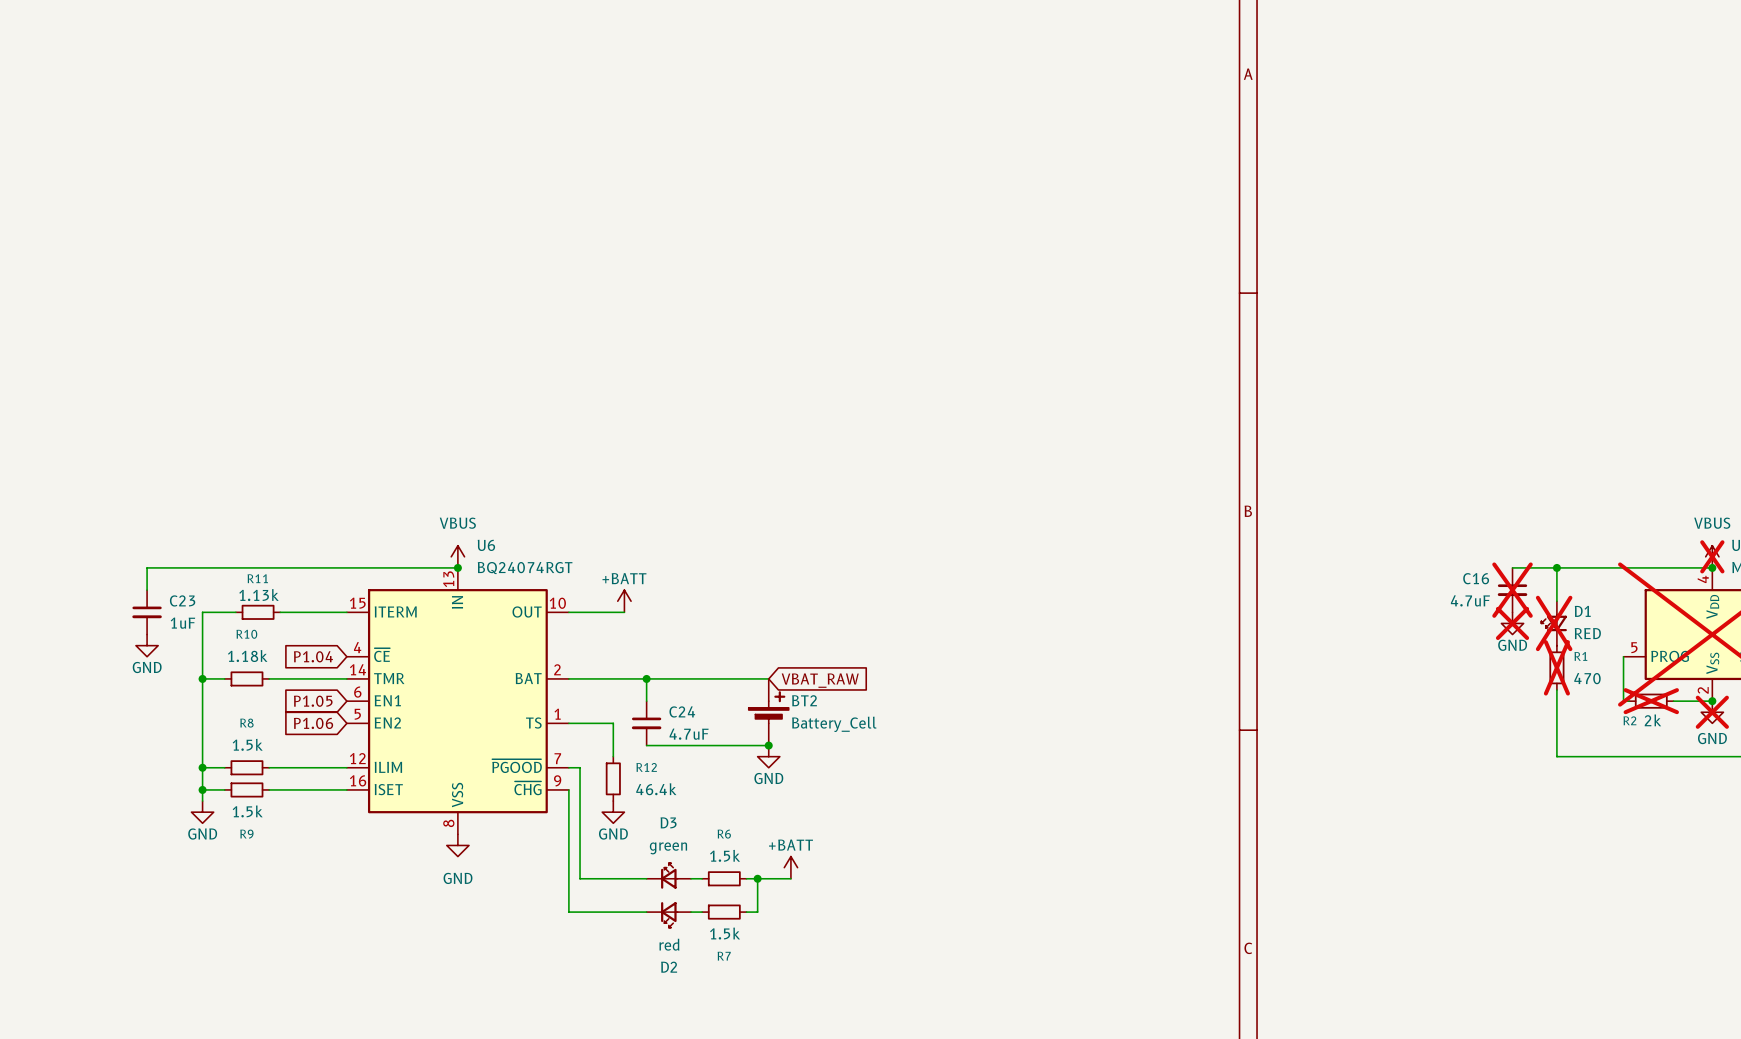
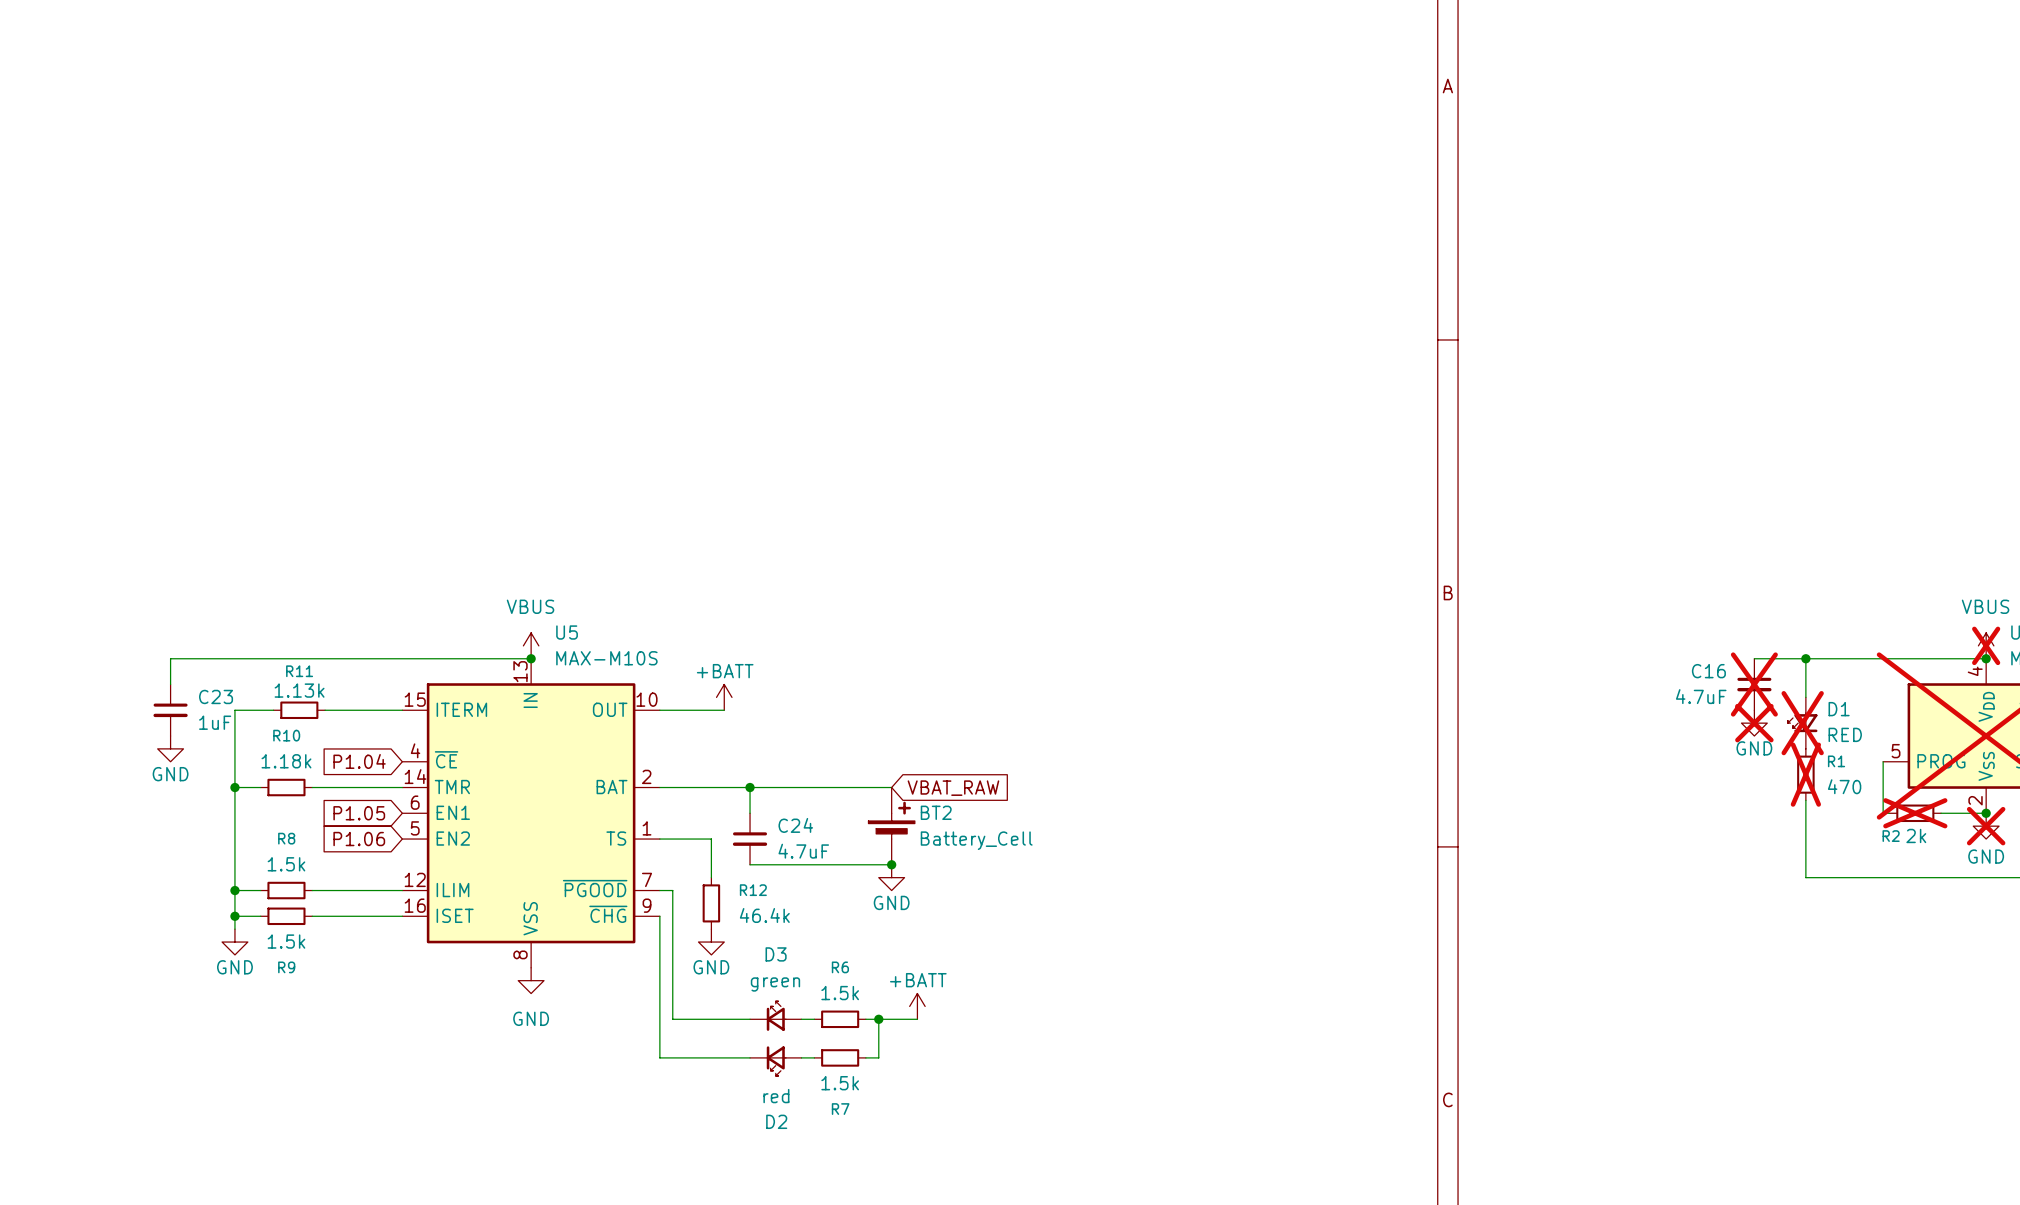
U6 name: U6 (486, 545) -> U5 (567, 632)
U6 value: BQ24074RGT (525, 568) -> MAX-M10S (606, 658)

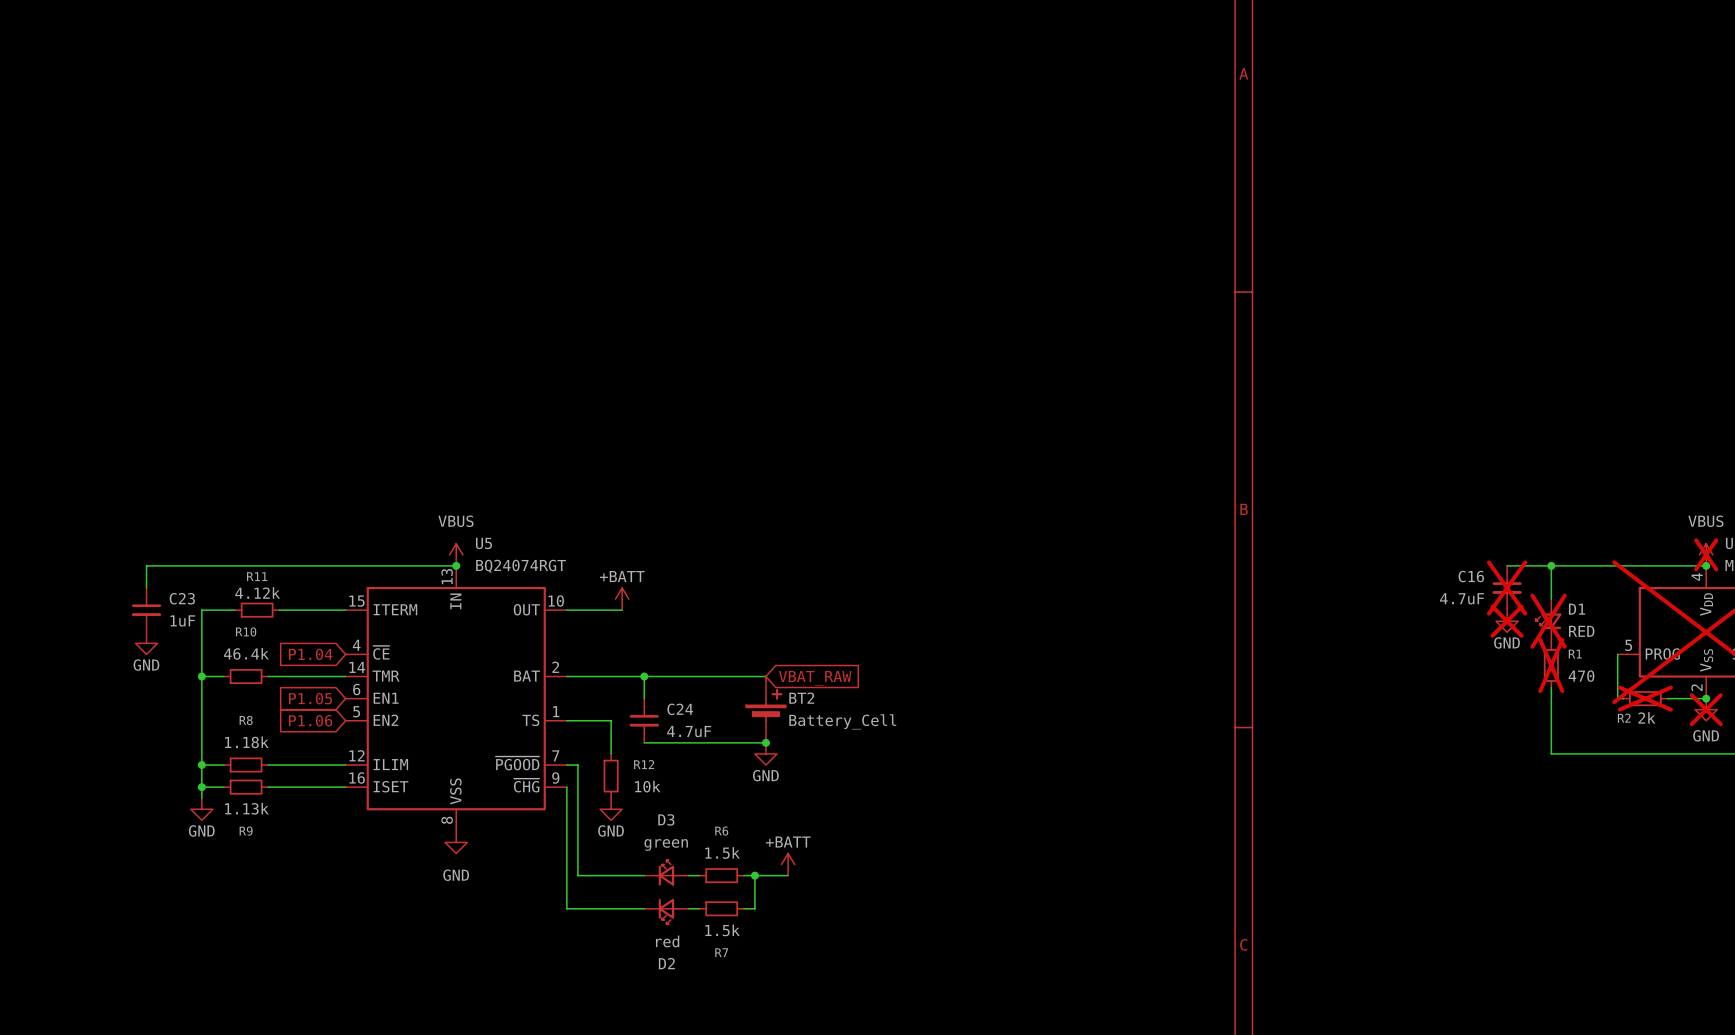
U5 value: MAX-M10S (606, 658) -> BQ24074RGT (521, 566)
R11 value: 1.13k (299, 690) -> 4.12k (257, 593)
R10 value: 1.18k (286, 761) -> 46.4k (246, 653)
R8 value: 1.5k (286, 864) -> 1.18k (246, 742)
R12 value: 46.4k (764, 915) -> 10k (647, 786)
R9 value: 1.5k (286, 941) -> 1.13k (246, 808)

